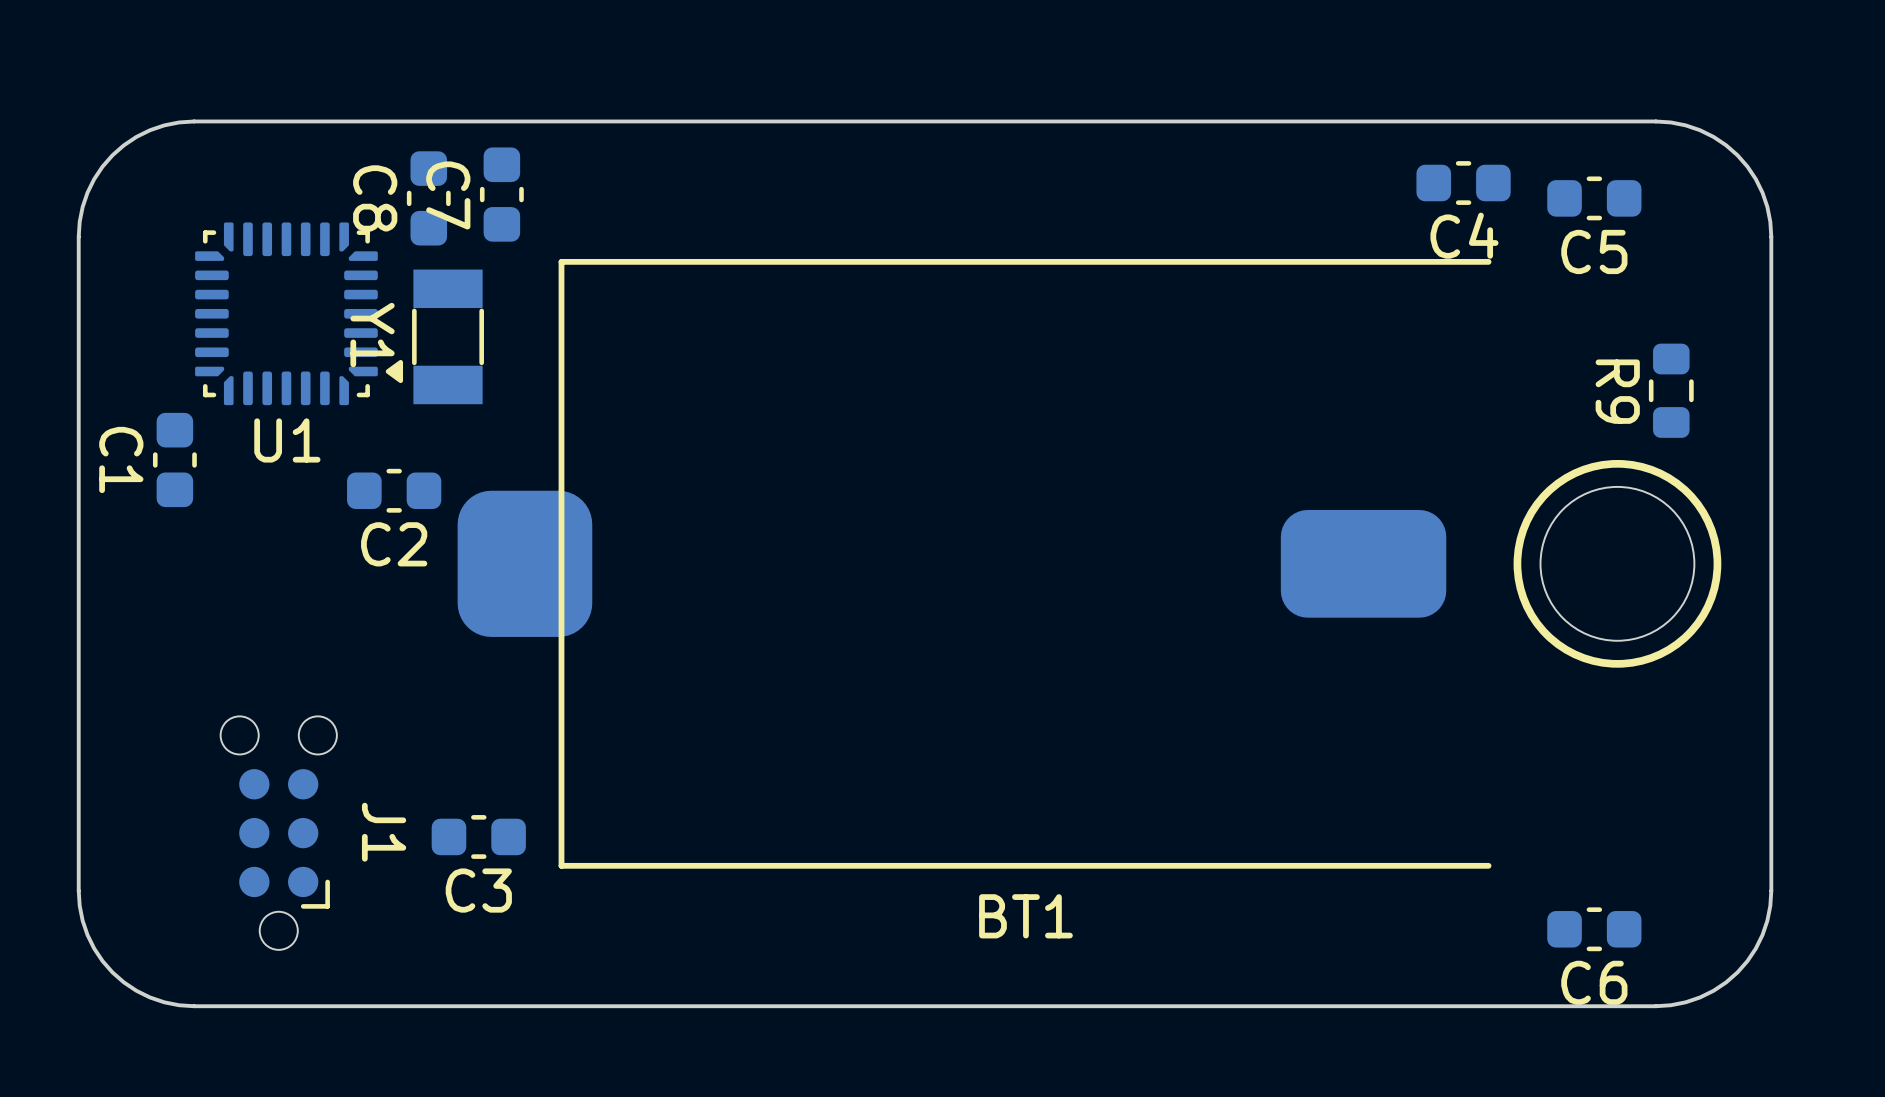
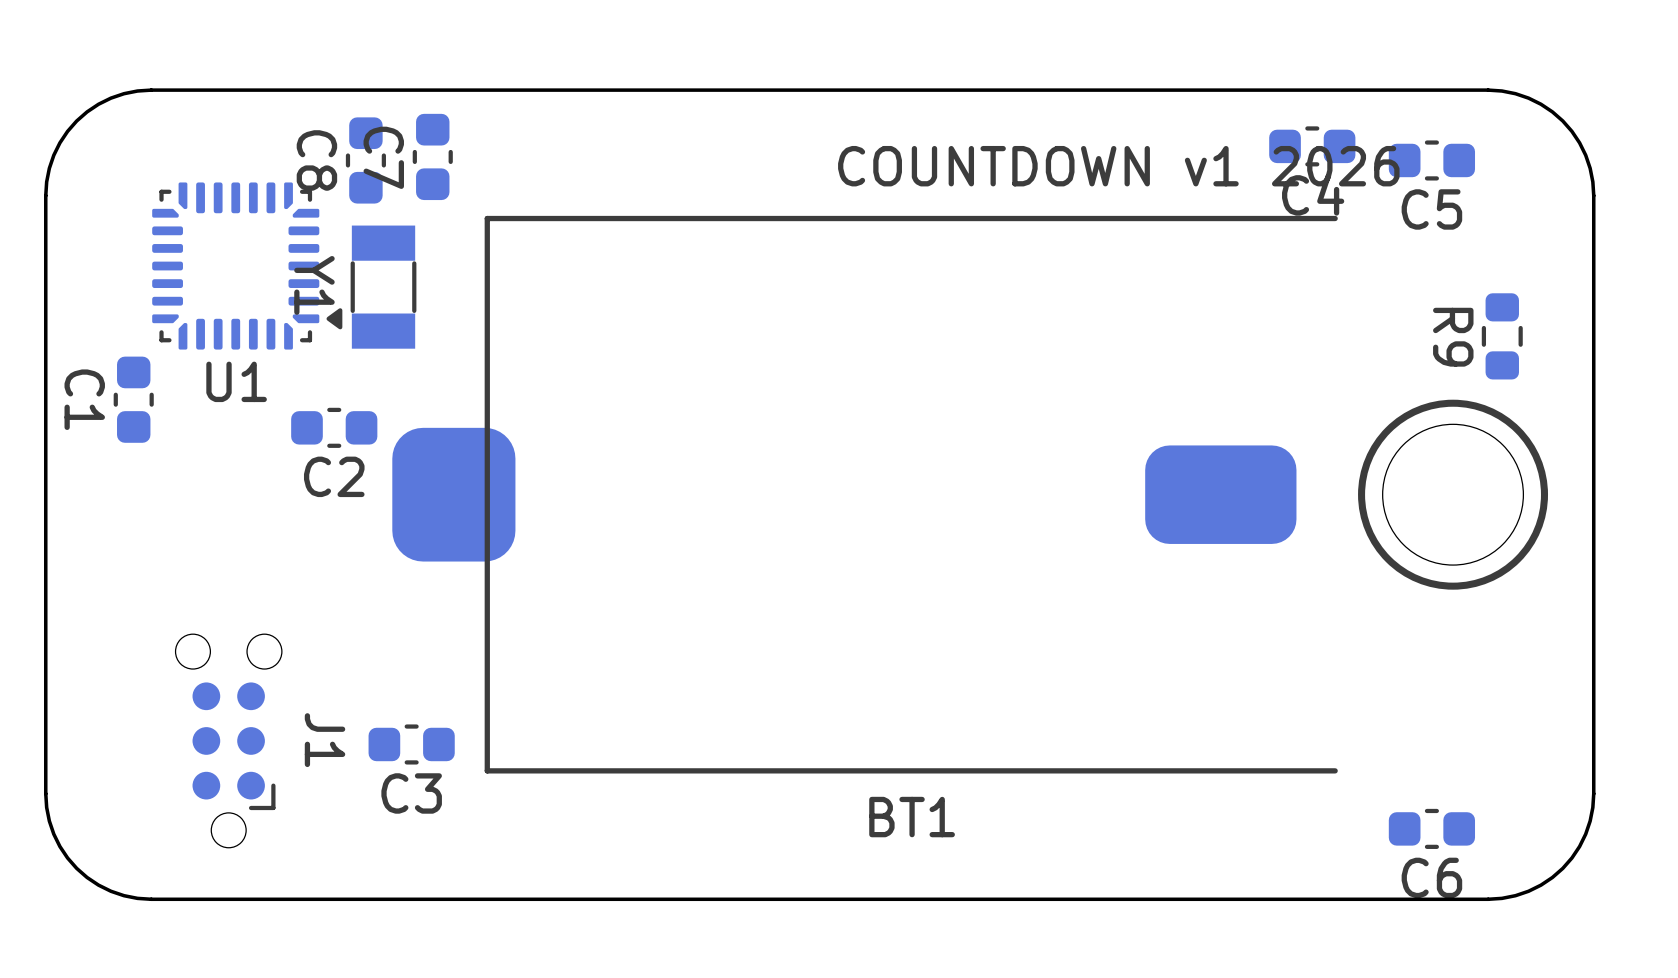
text: none -> COUNTDOWN v1 2026 (1118, 166)

